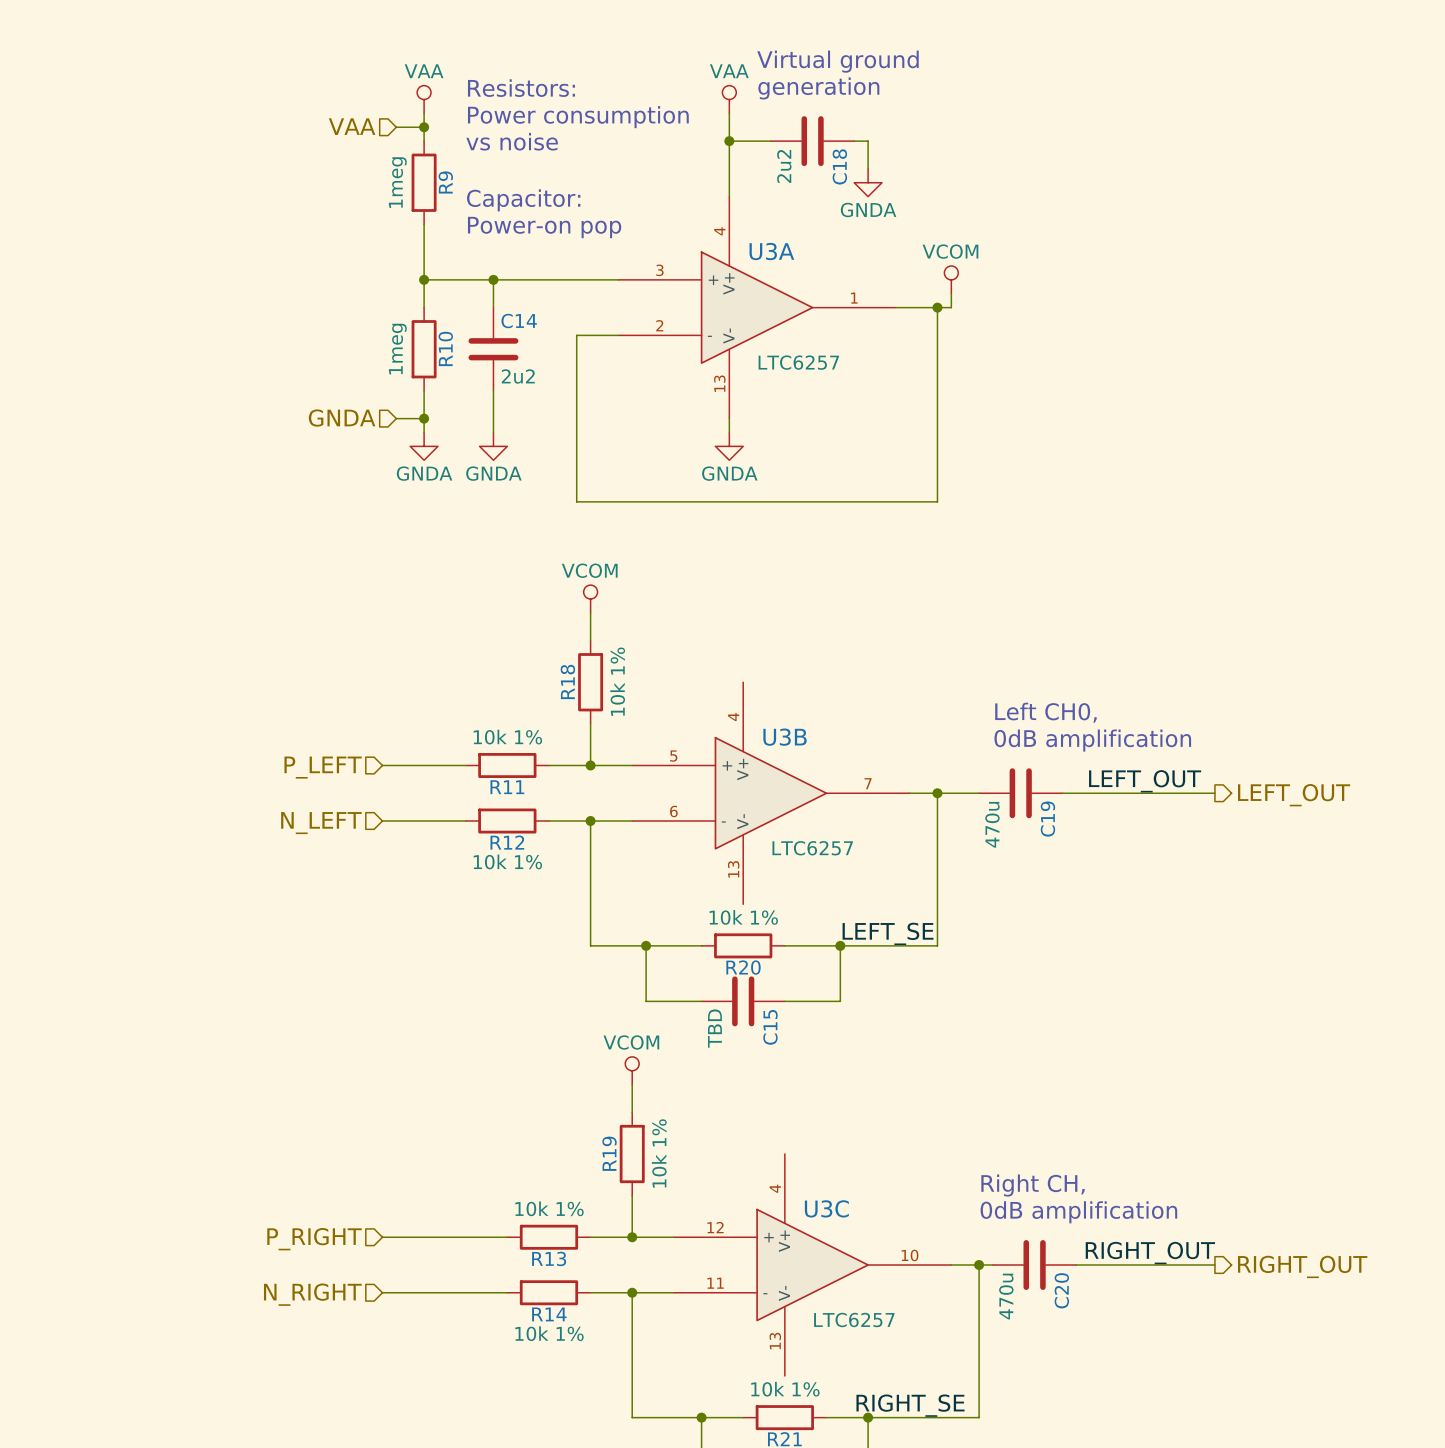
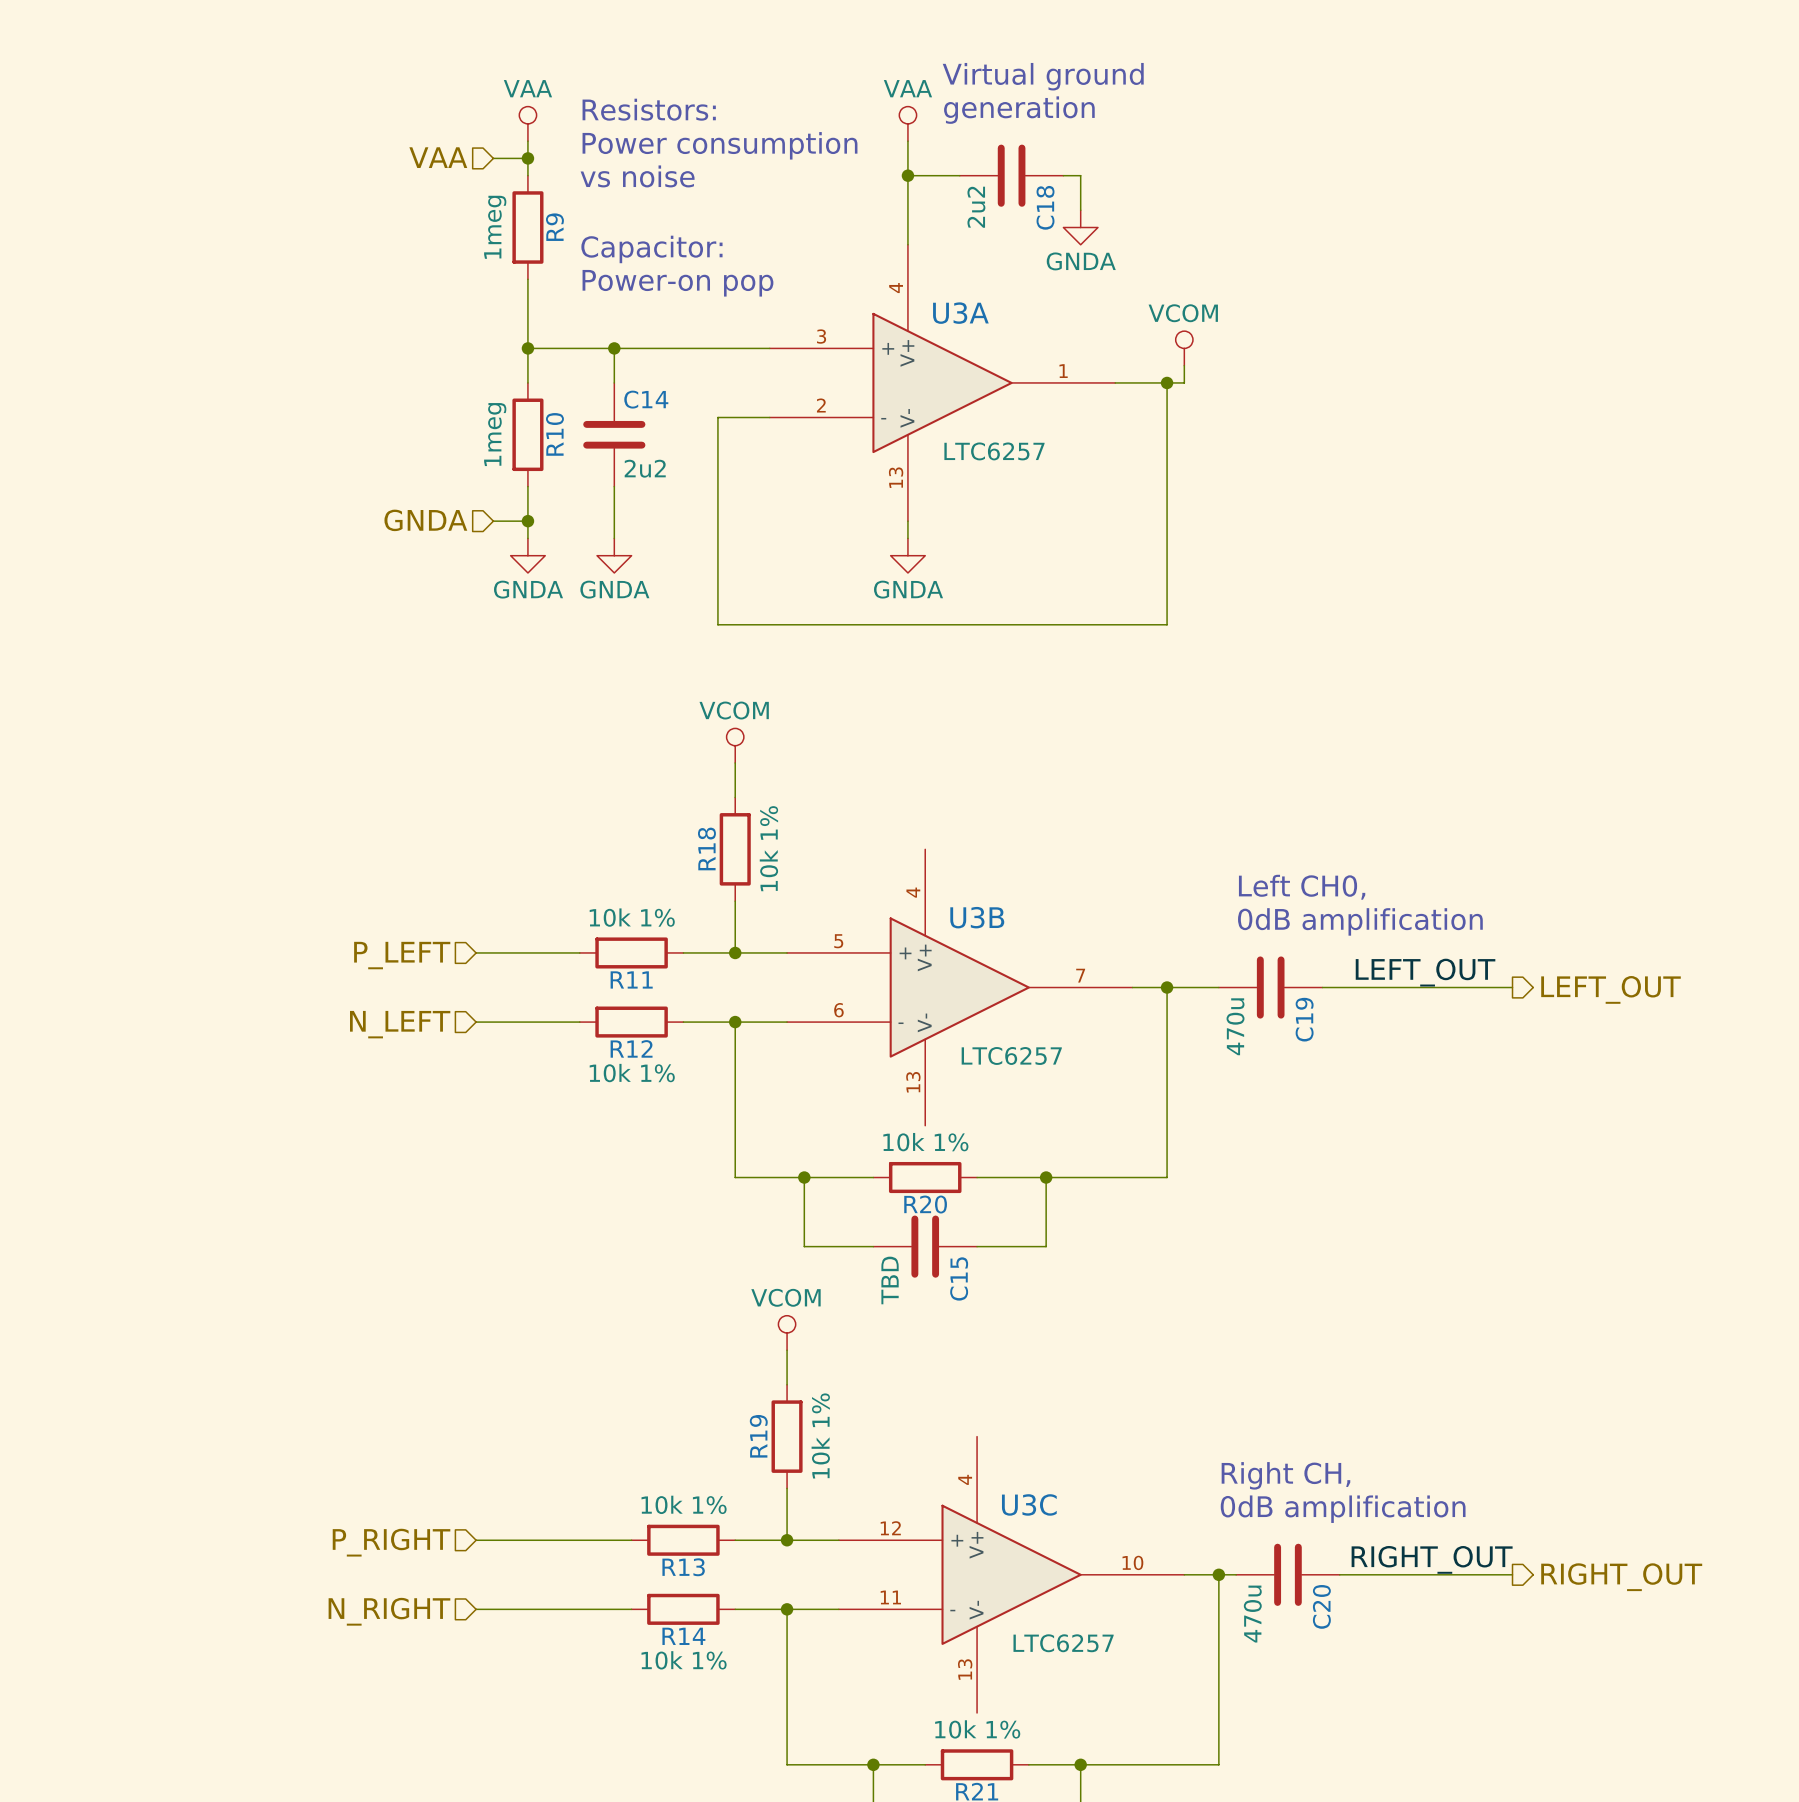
label: LEFT_SE (888, 933) -> none
label: RIGHT_SE (910, 1405) -> none

